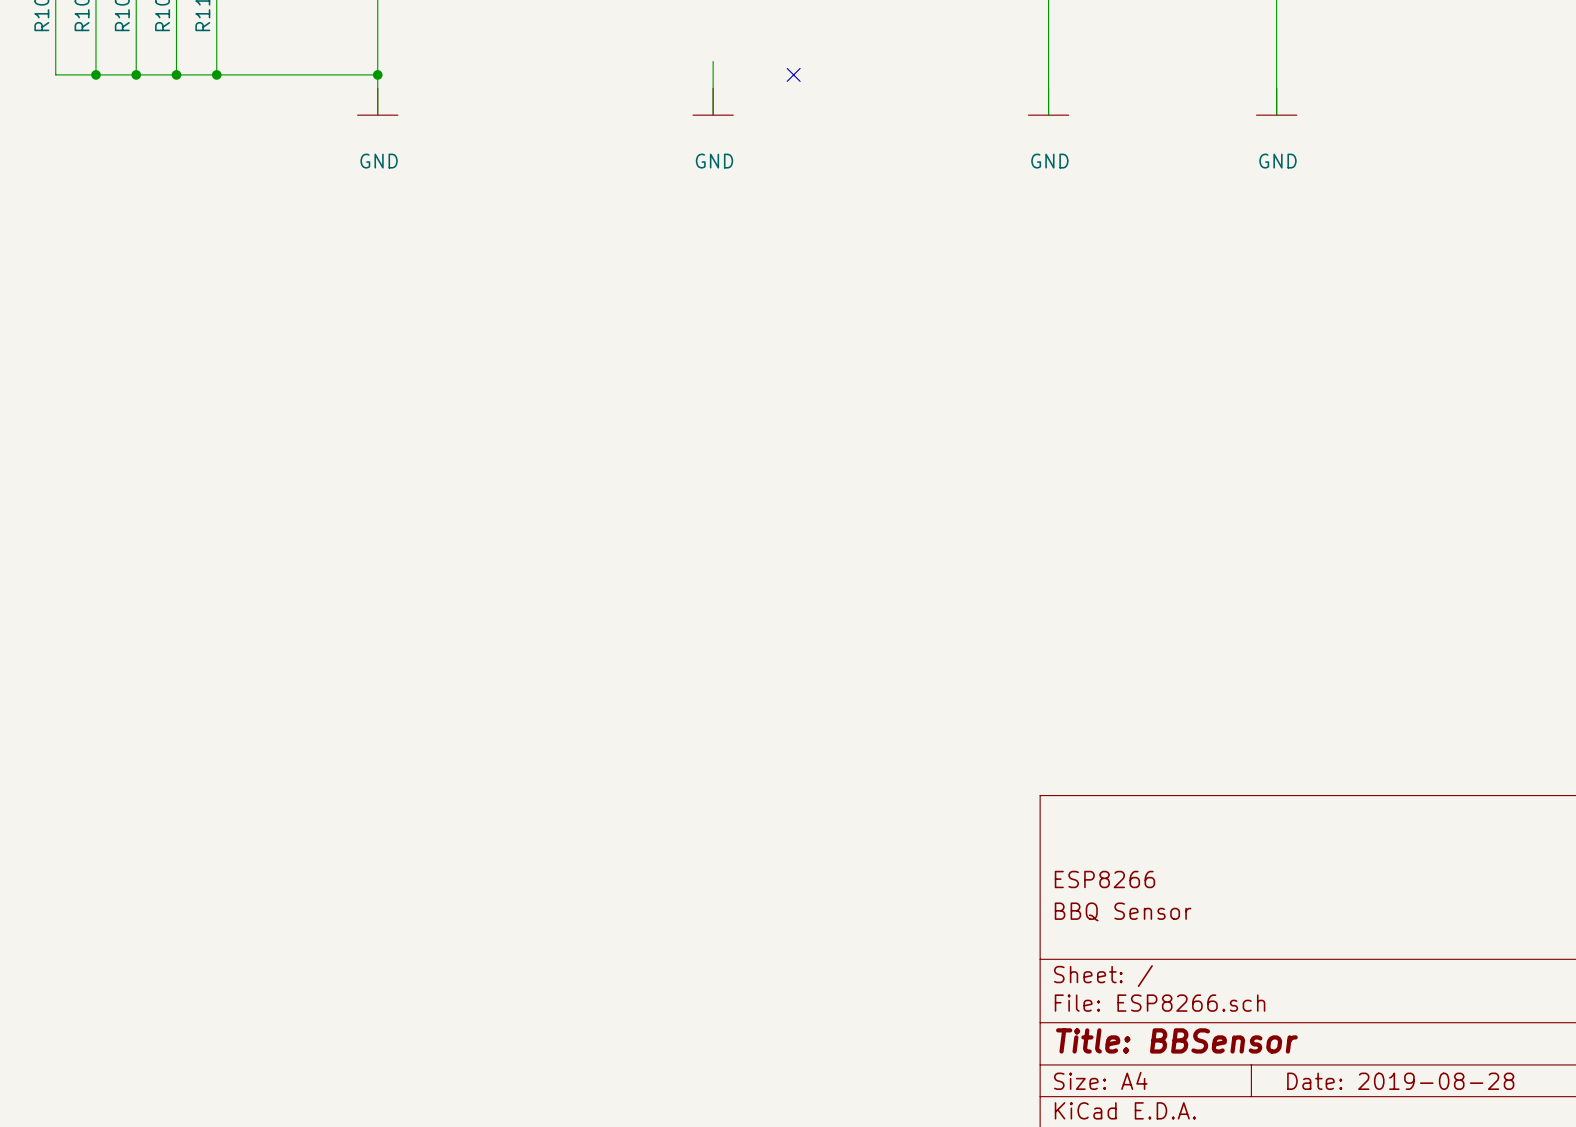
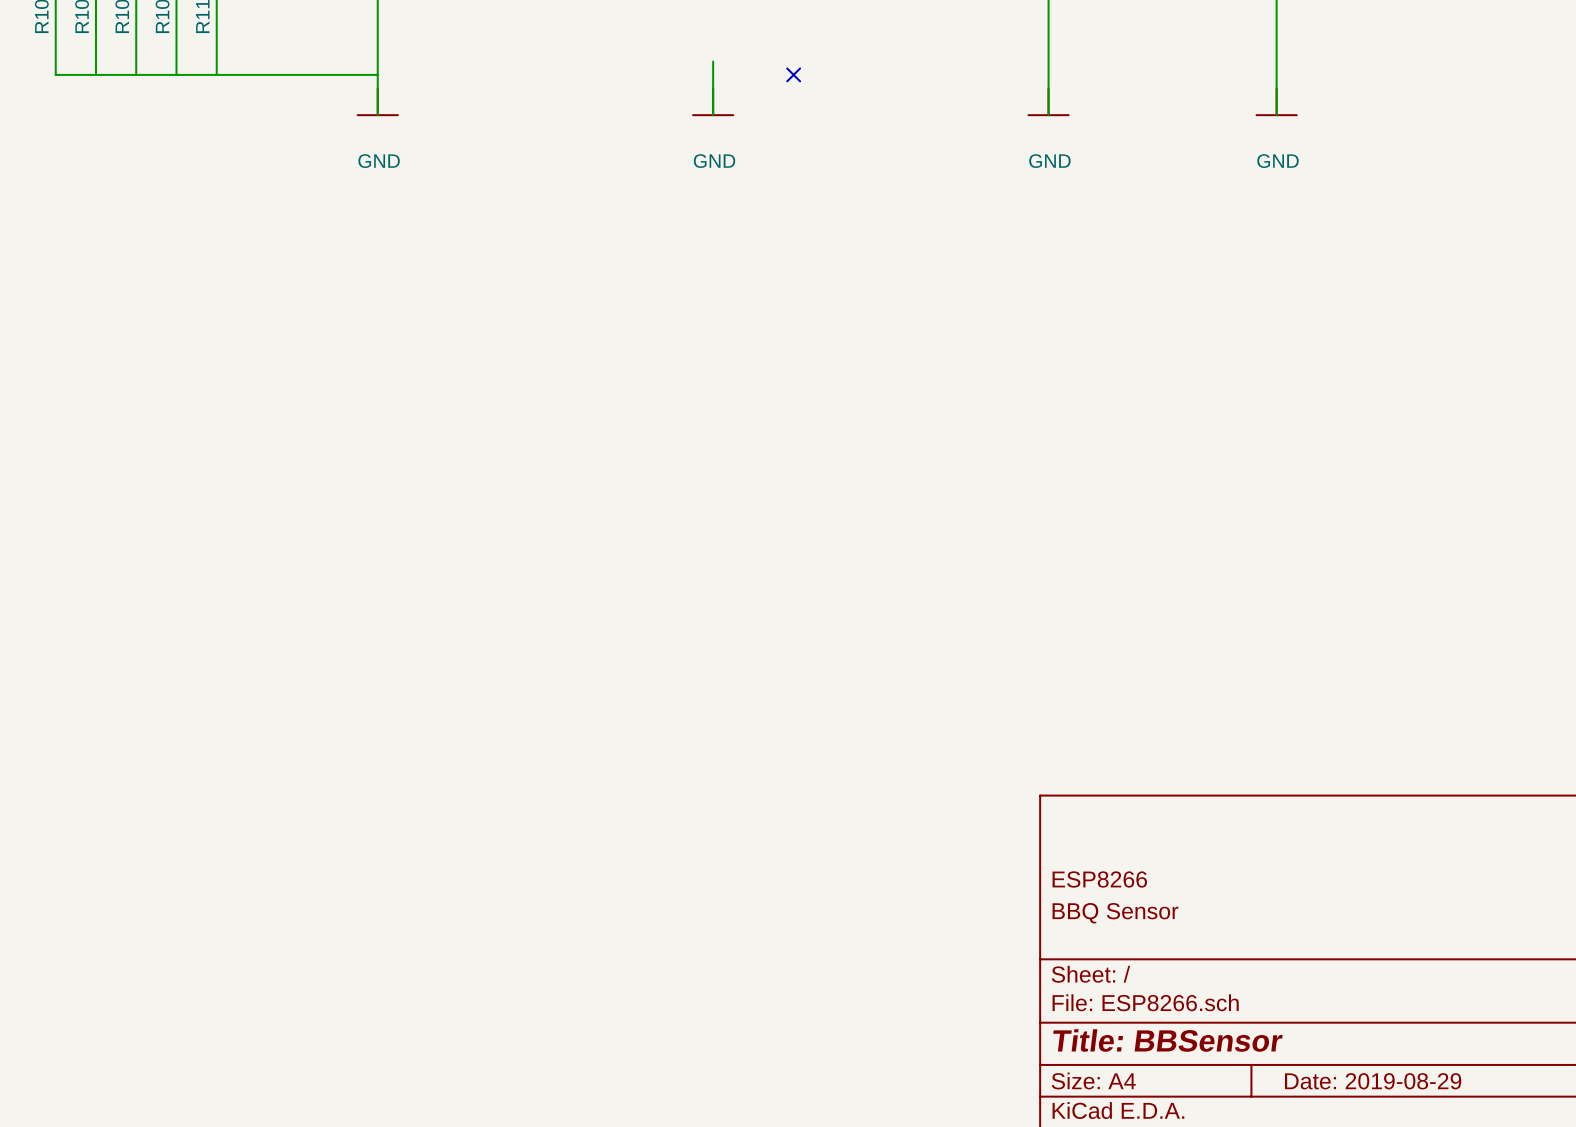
junction: (95, 74) -> none
junction: (136, 74) -> none
junction: (176, 74) -> none
junction: (216, 74) -> none
junction: (377, 74) -> none
title block: Date: 2019-08-28 (1400, 1081) -> Date: 2019-08-29 (1373, 1081)

